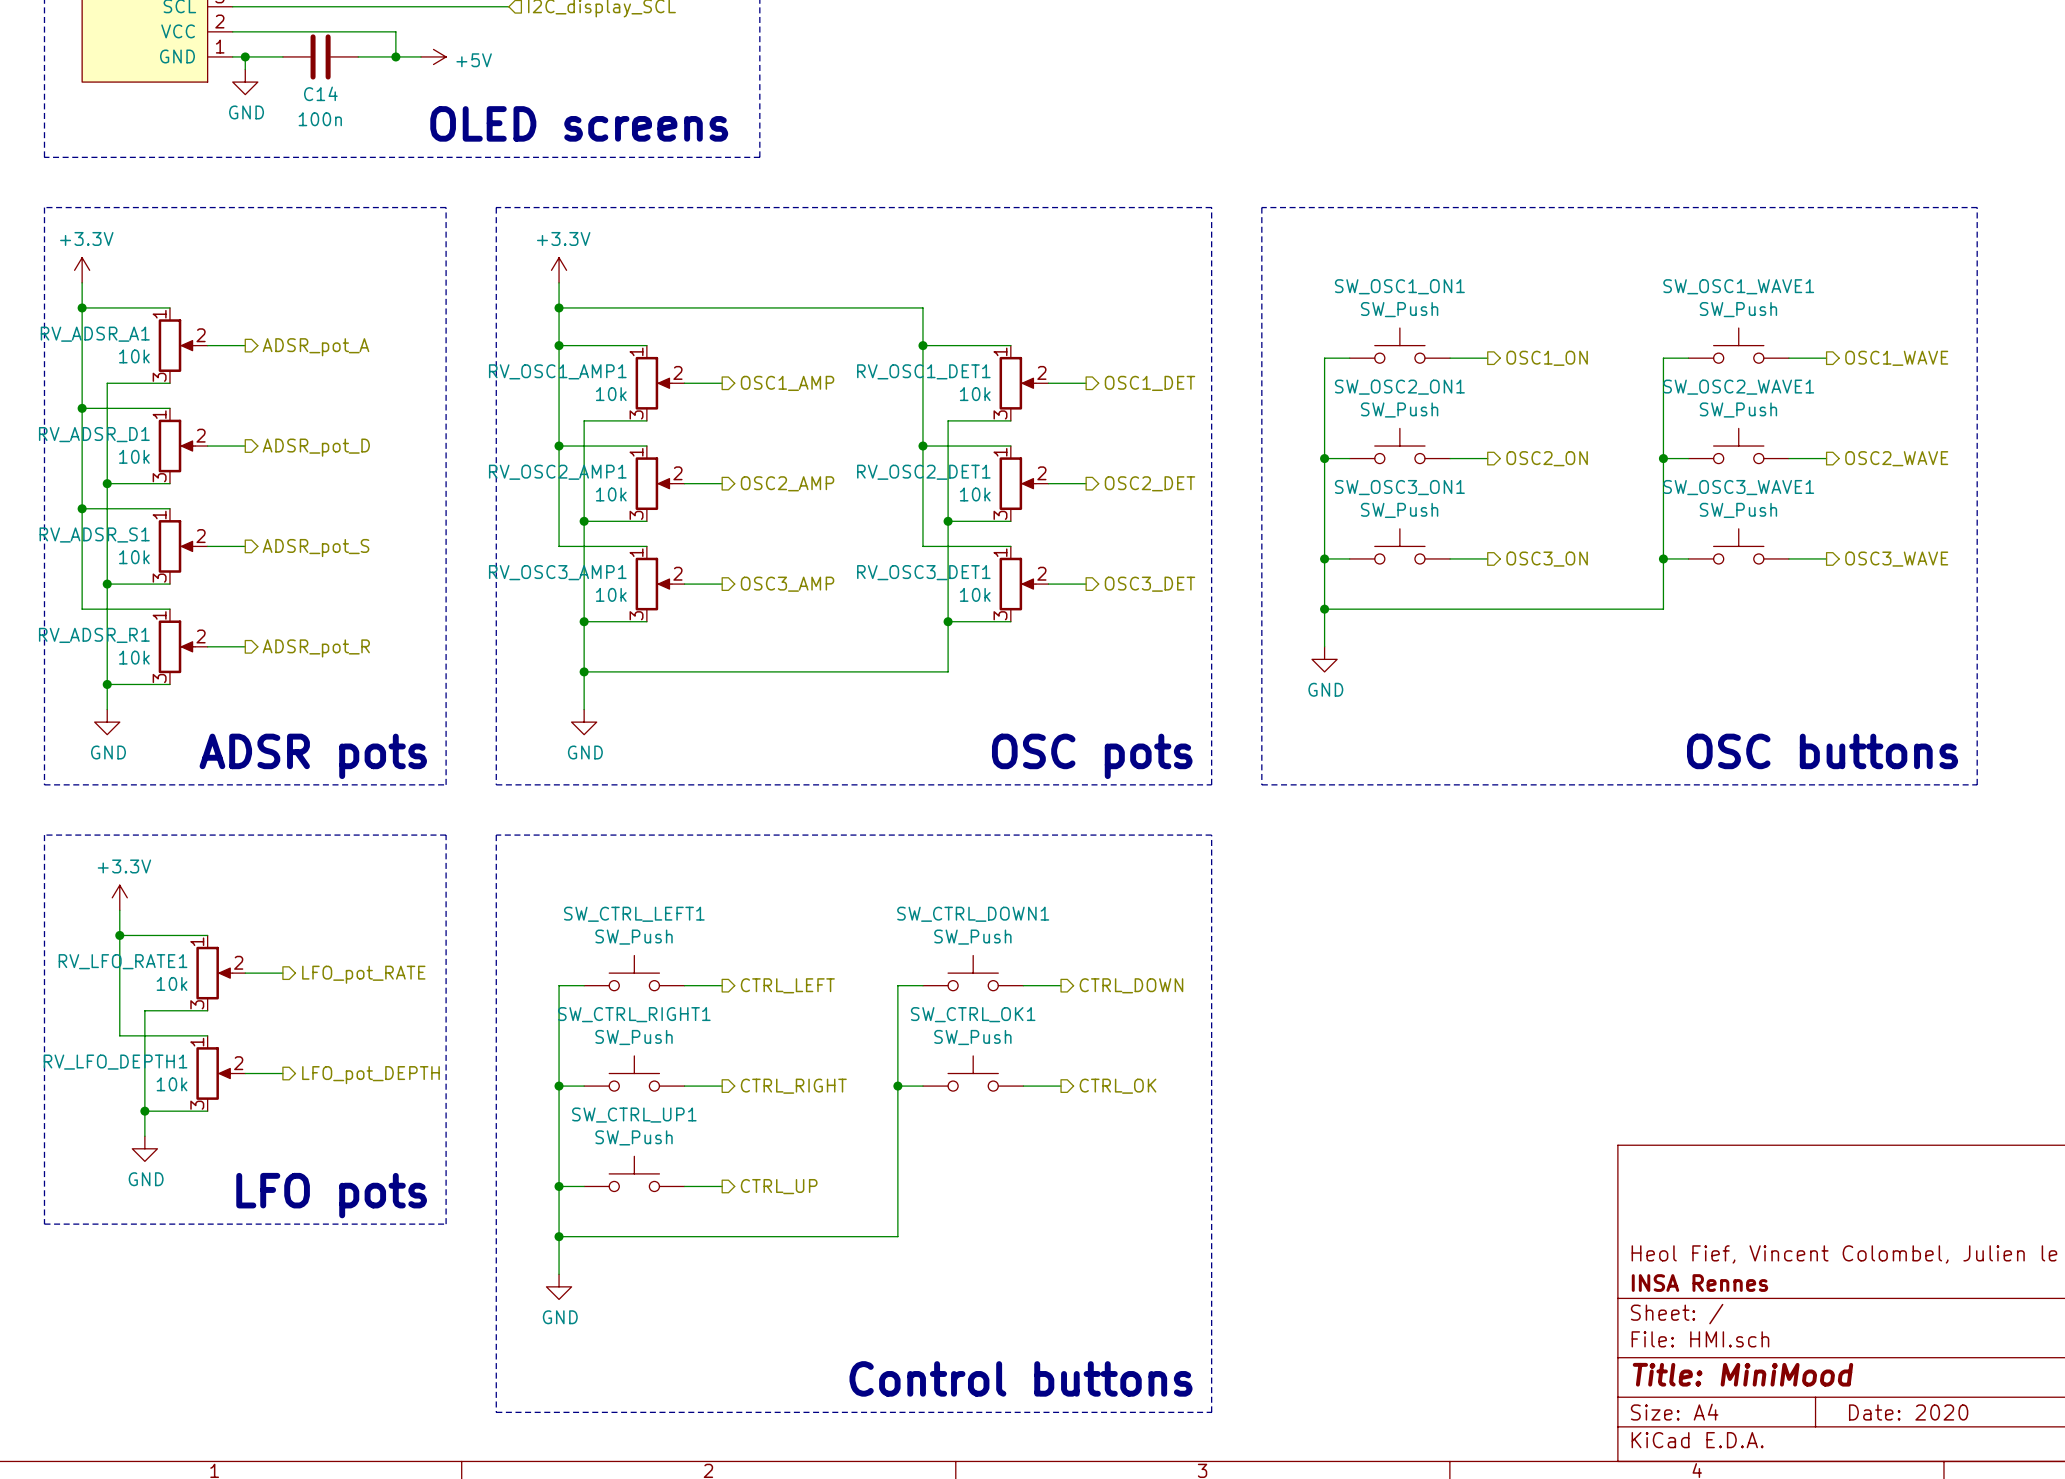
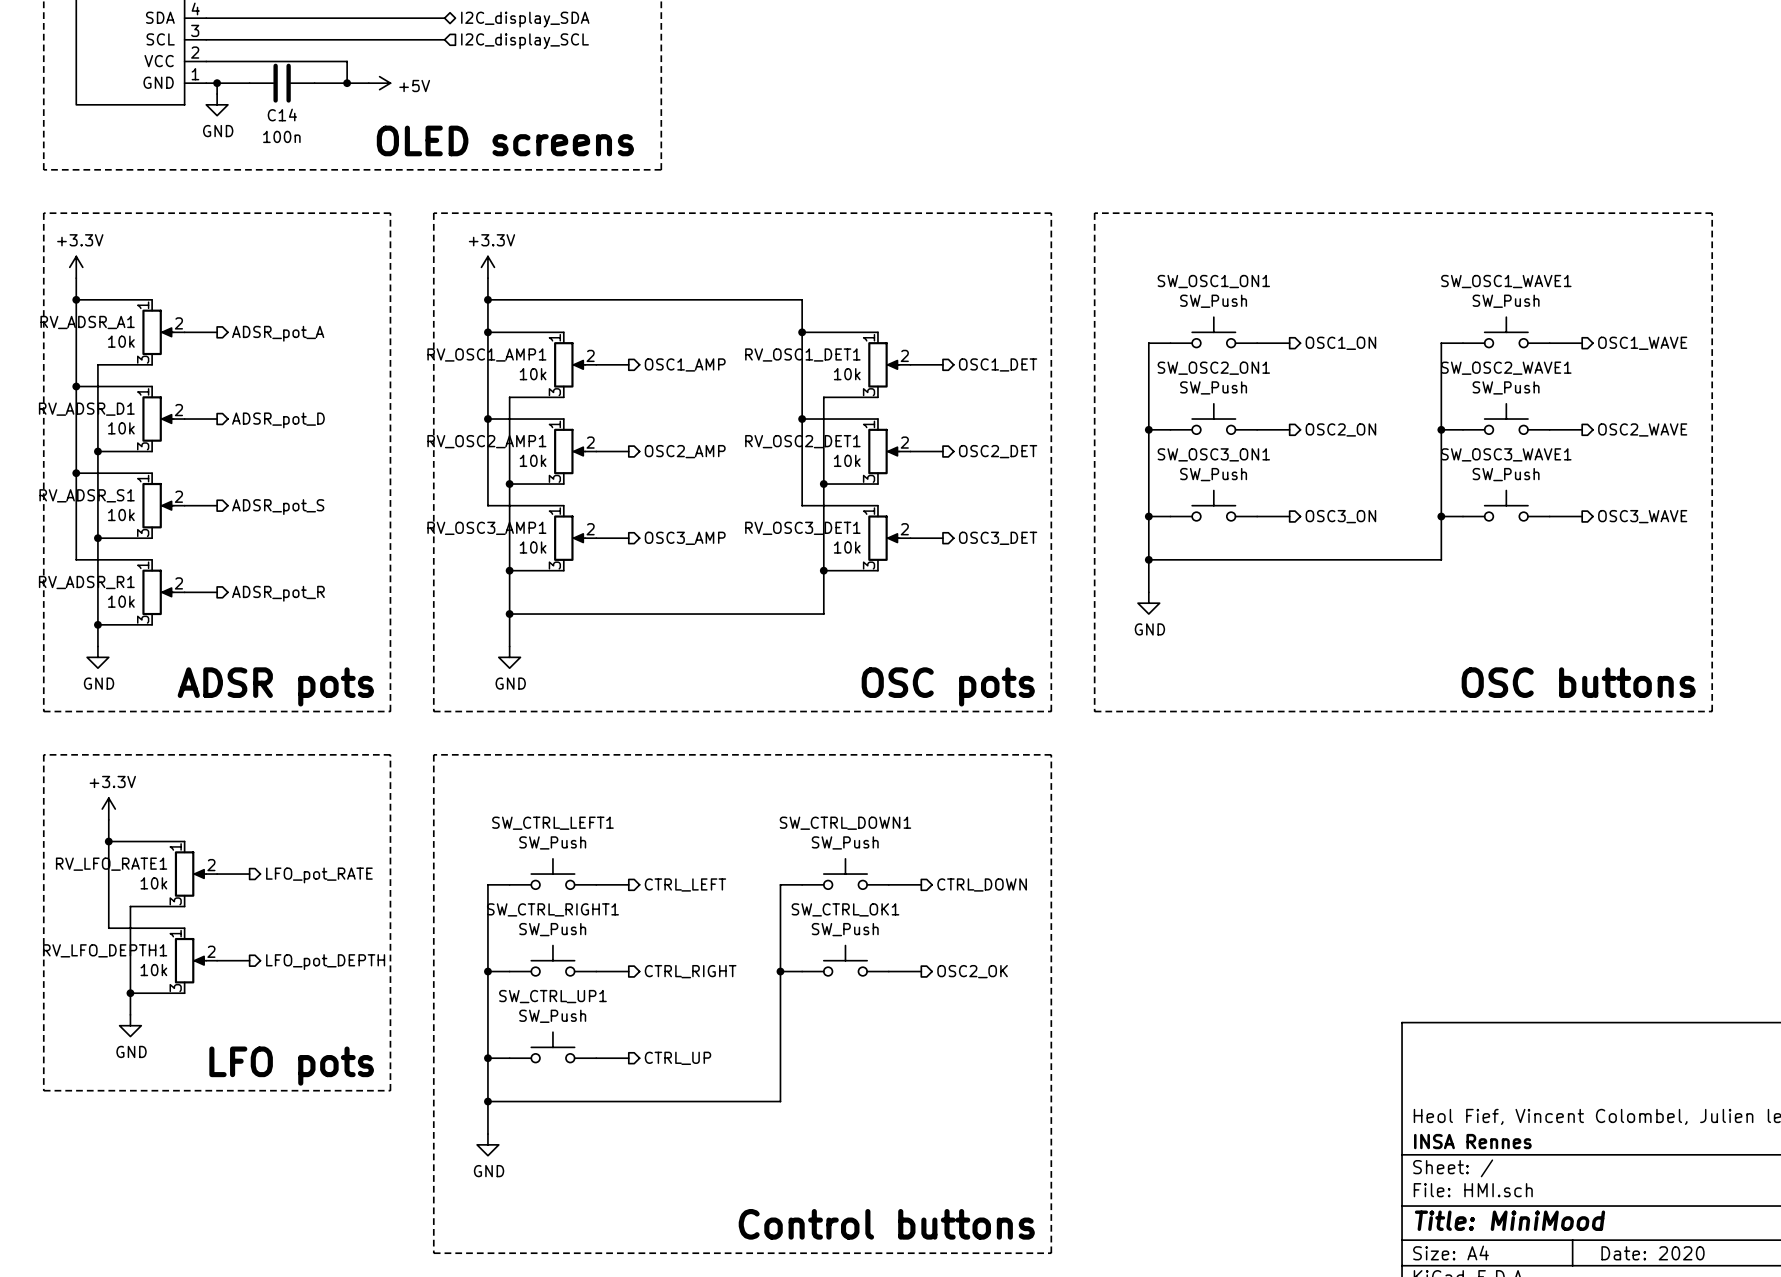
hierarchical label: CTRL_OK (1118, 1086) -> OSC2_OK (972, 971)

